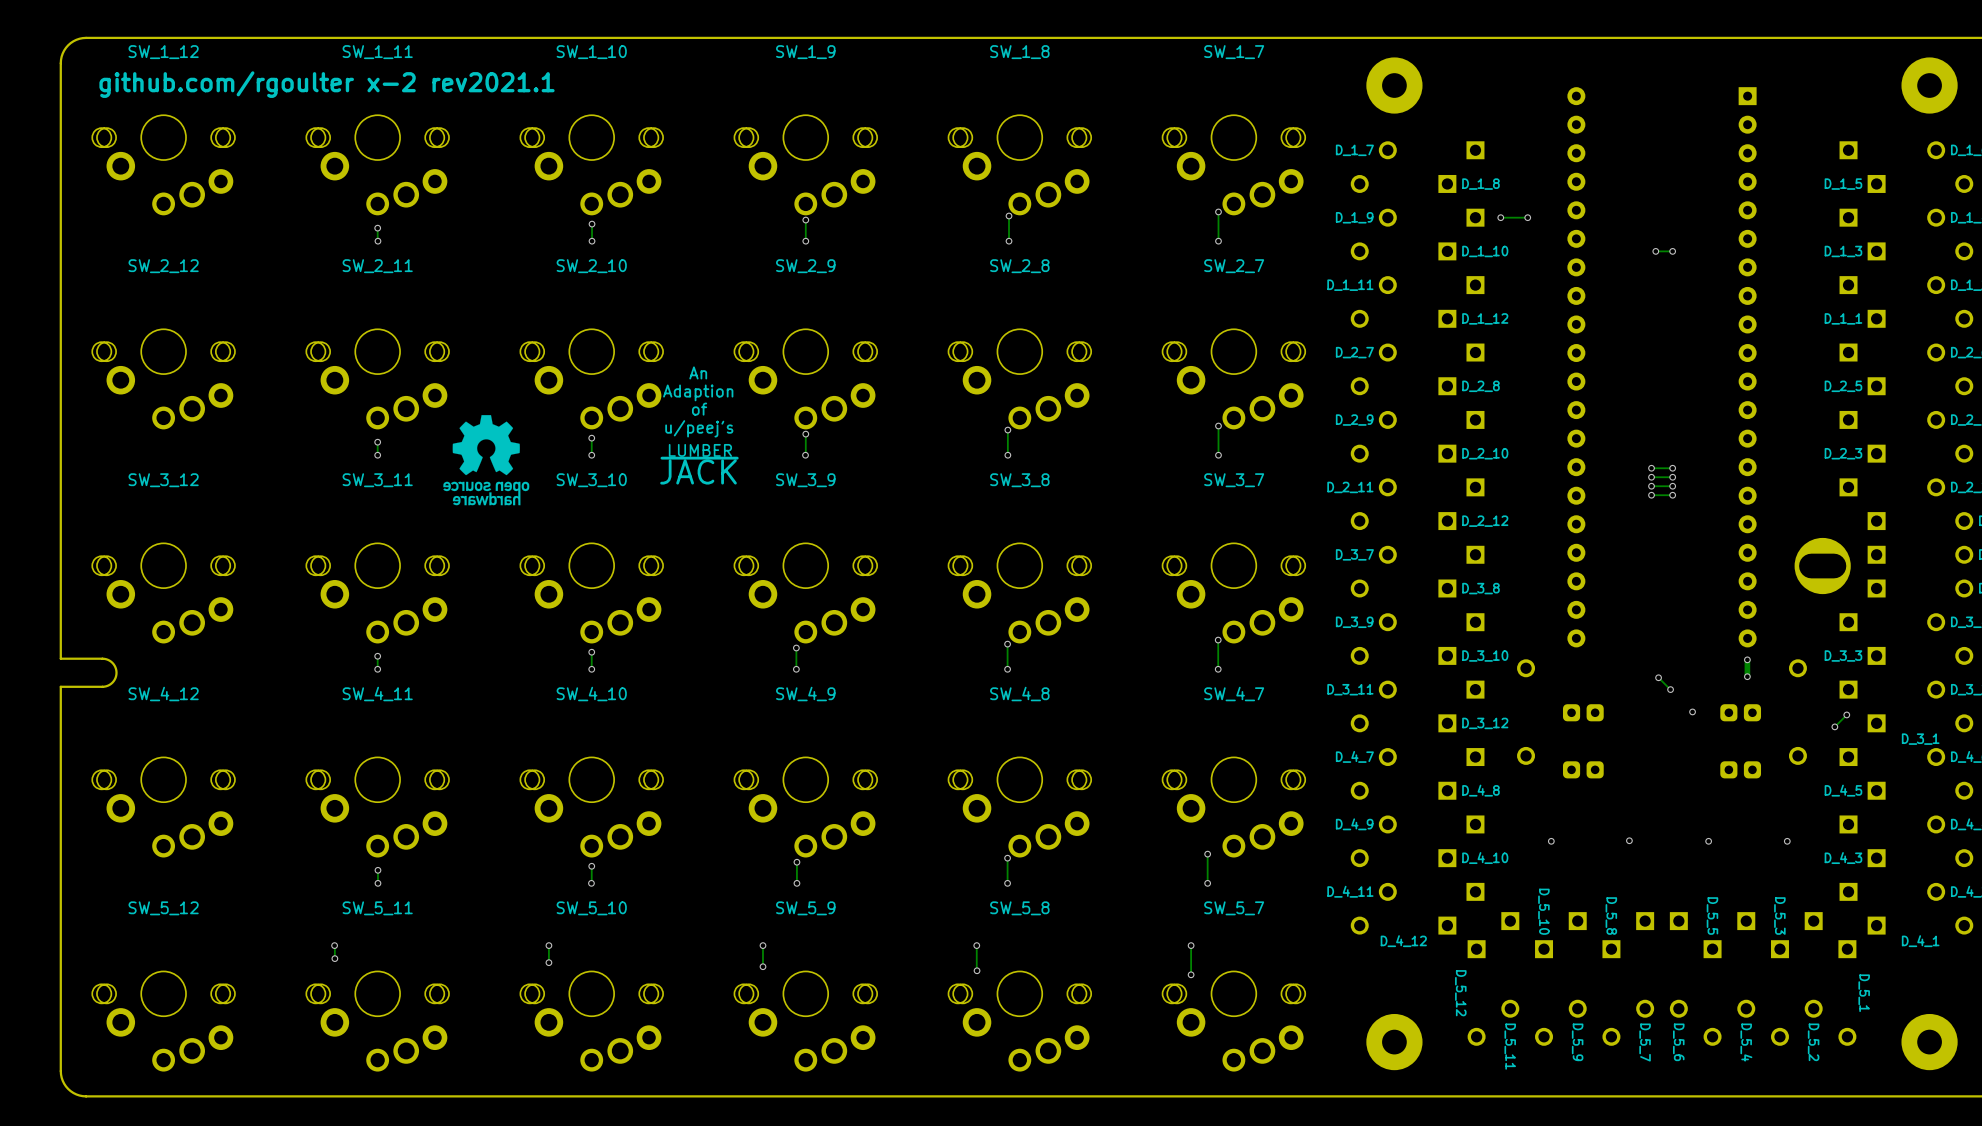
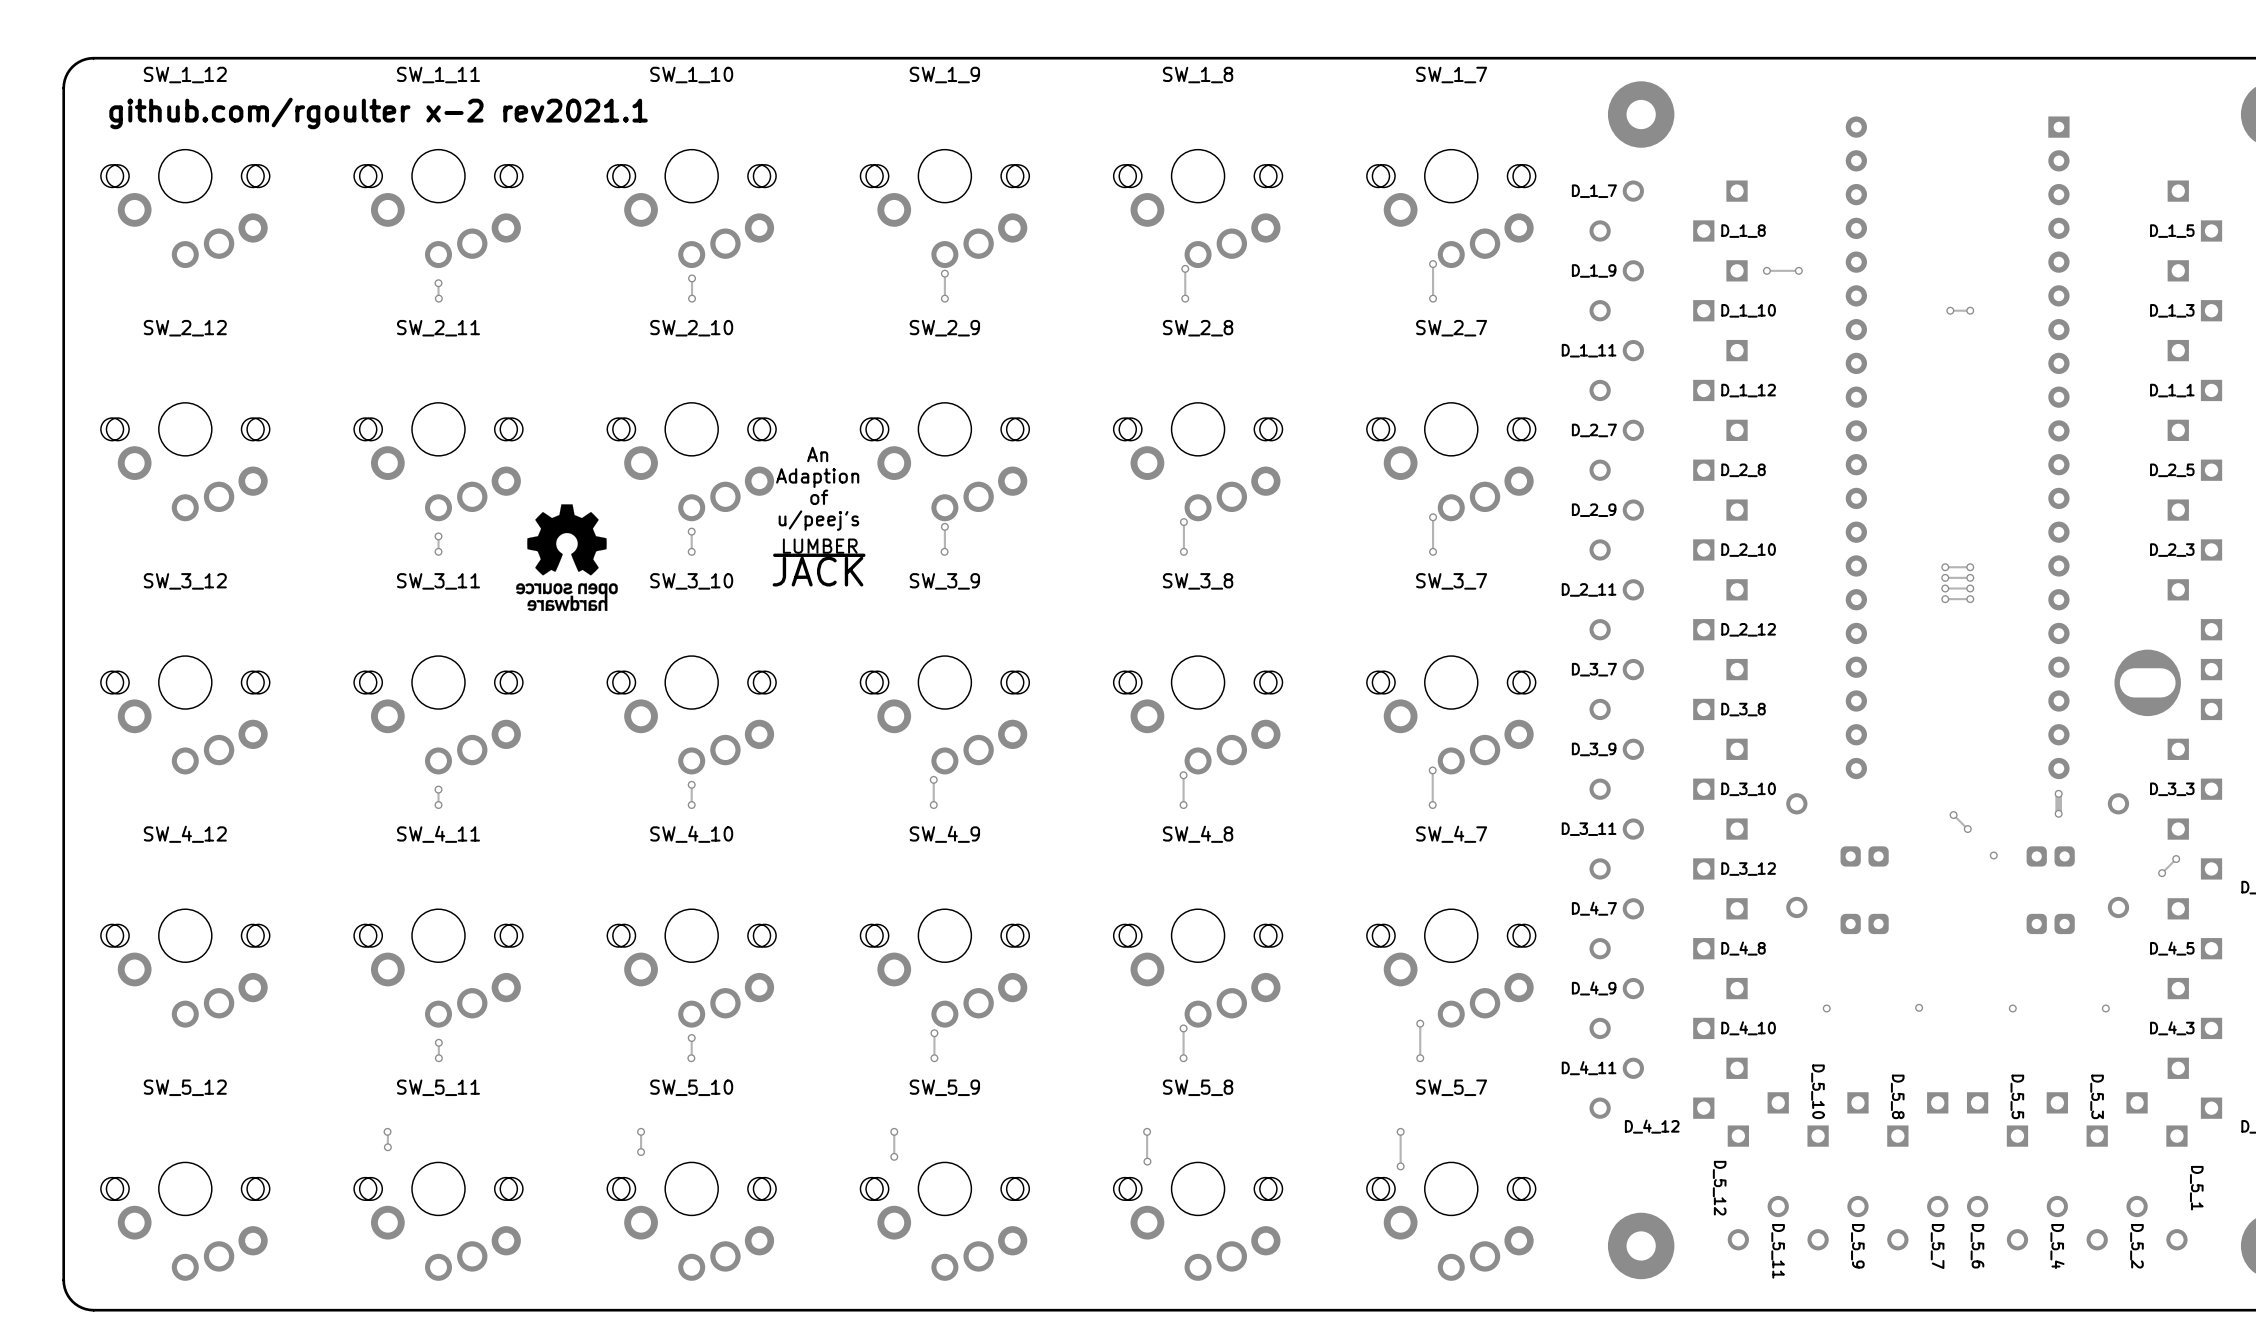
board edge: (60, 658) (106, 659) (113, 664) (116, 672) (113, 681) (106, 686) (60, 686) -> (63, 792) (63, 825)

